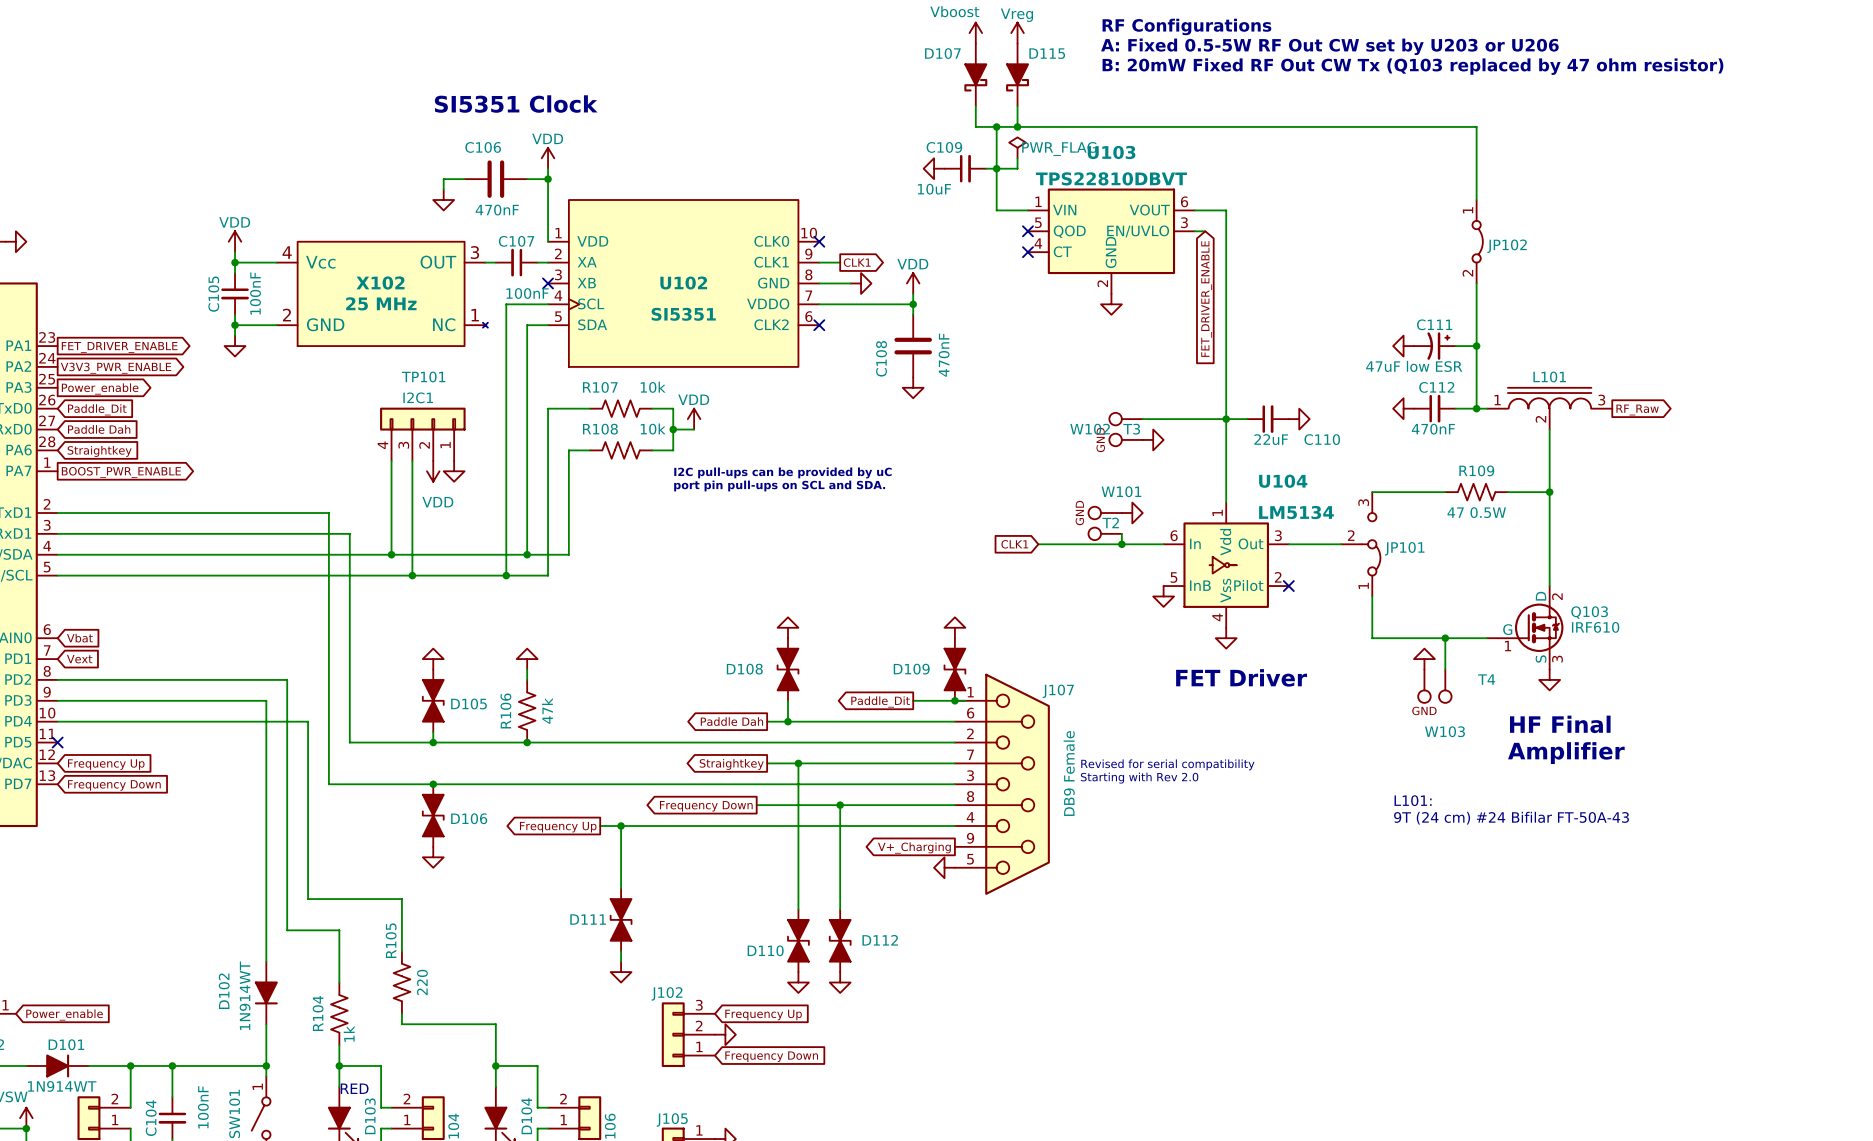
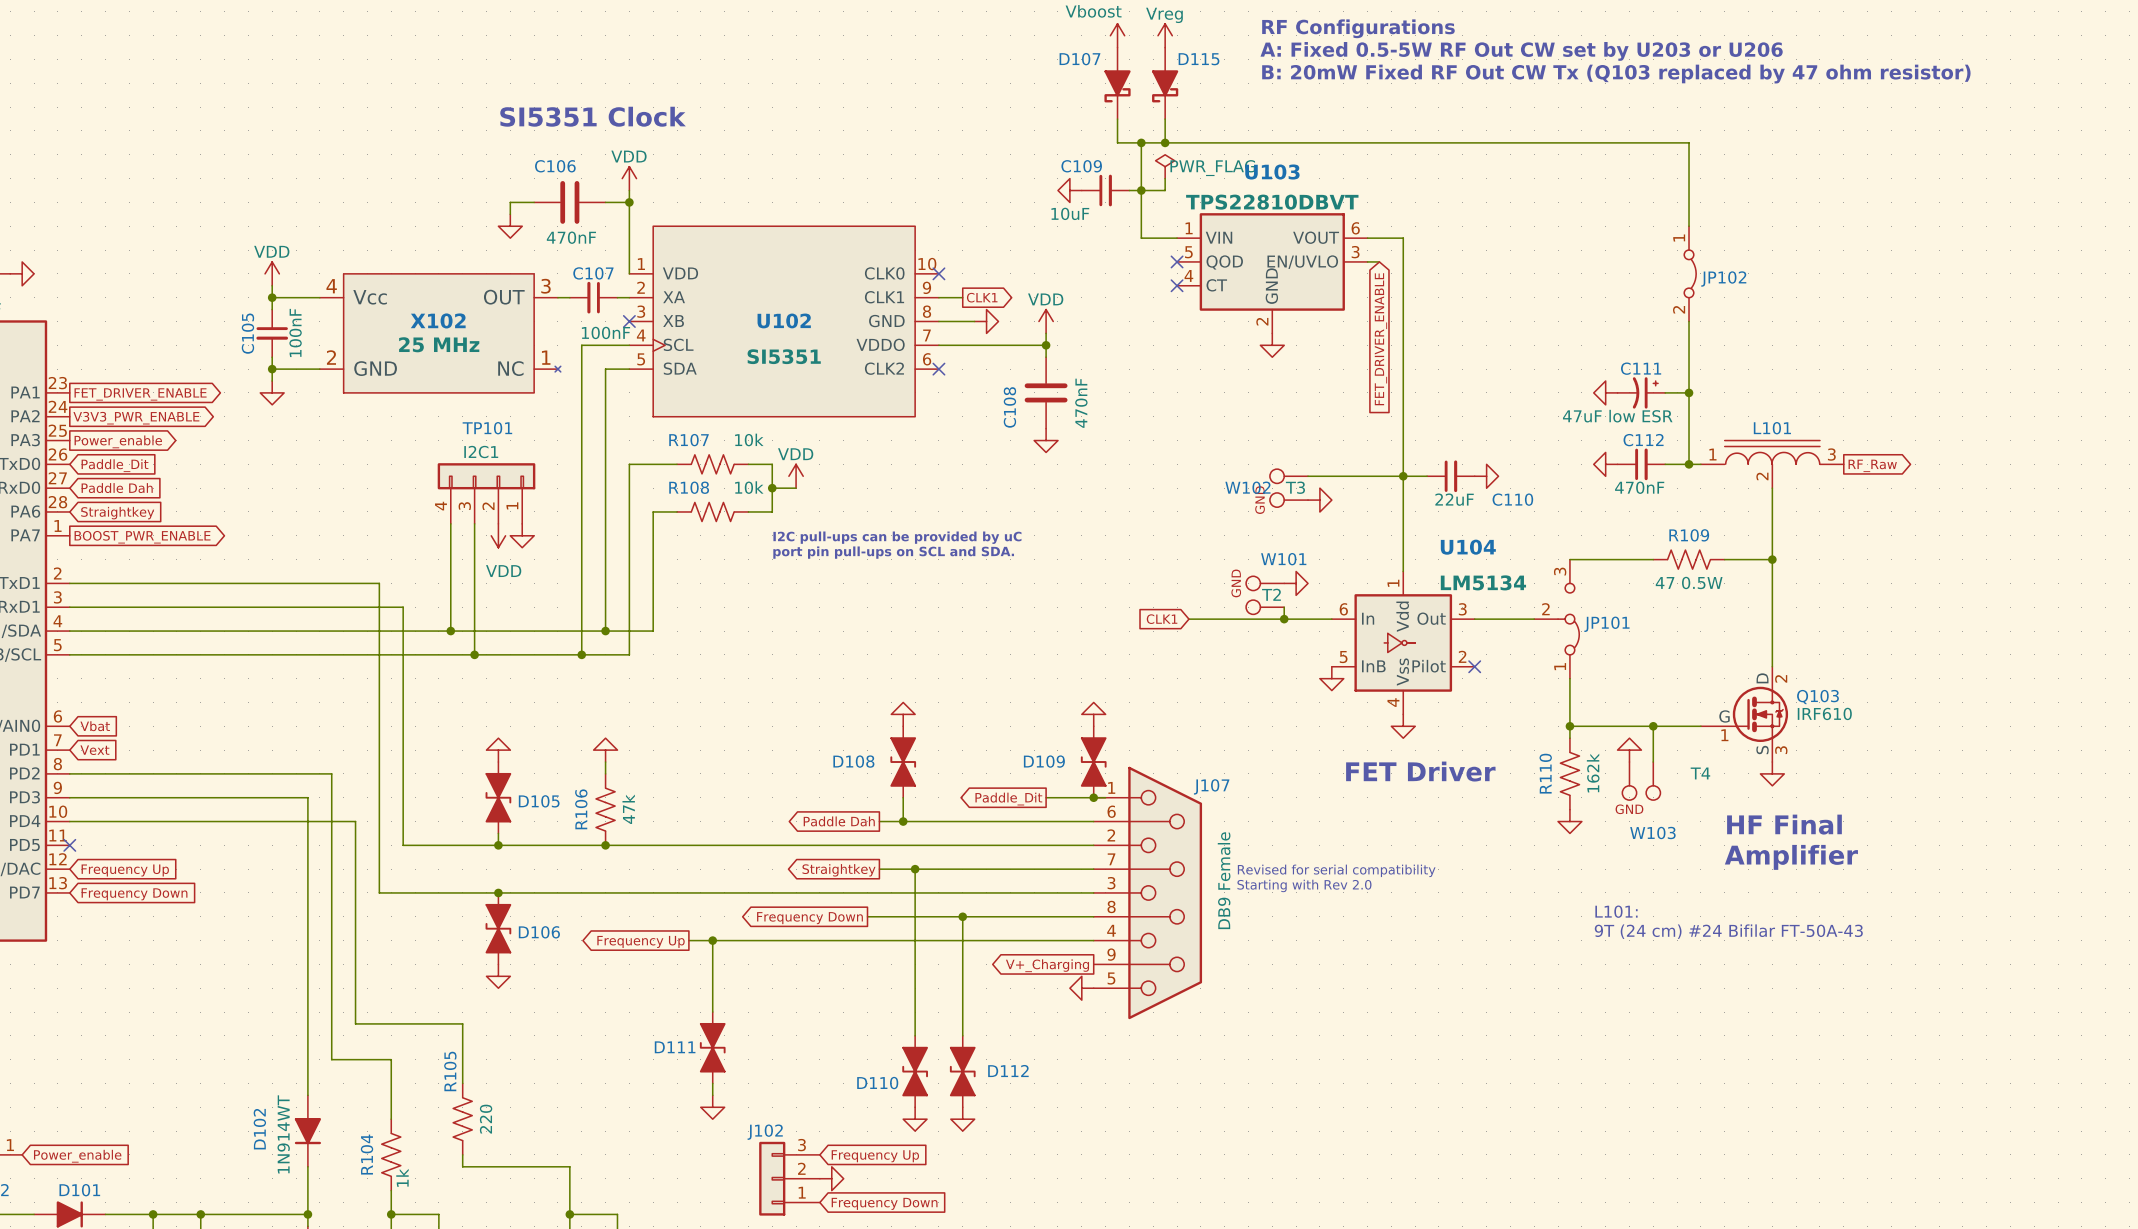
wire: none -> (1569, 726) (1569, 738)
junction: none -> (1569, 726)
R110: none -> 162k (1569, 773)
power symbol: none -> (1569, 821)

